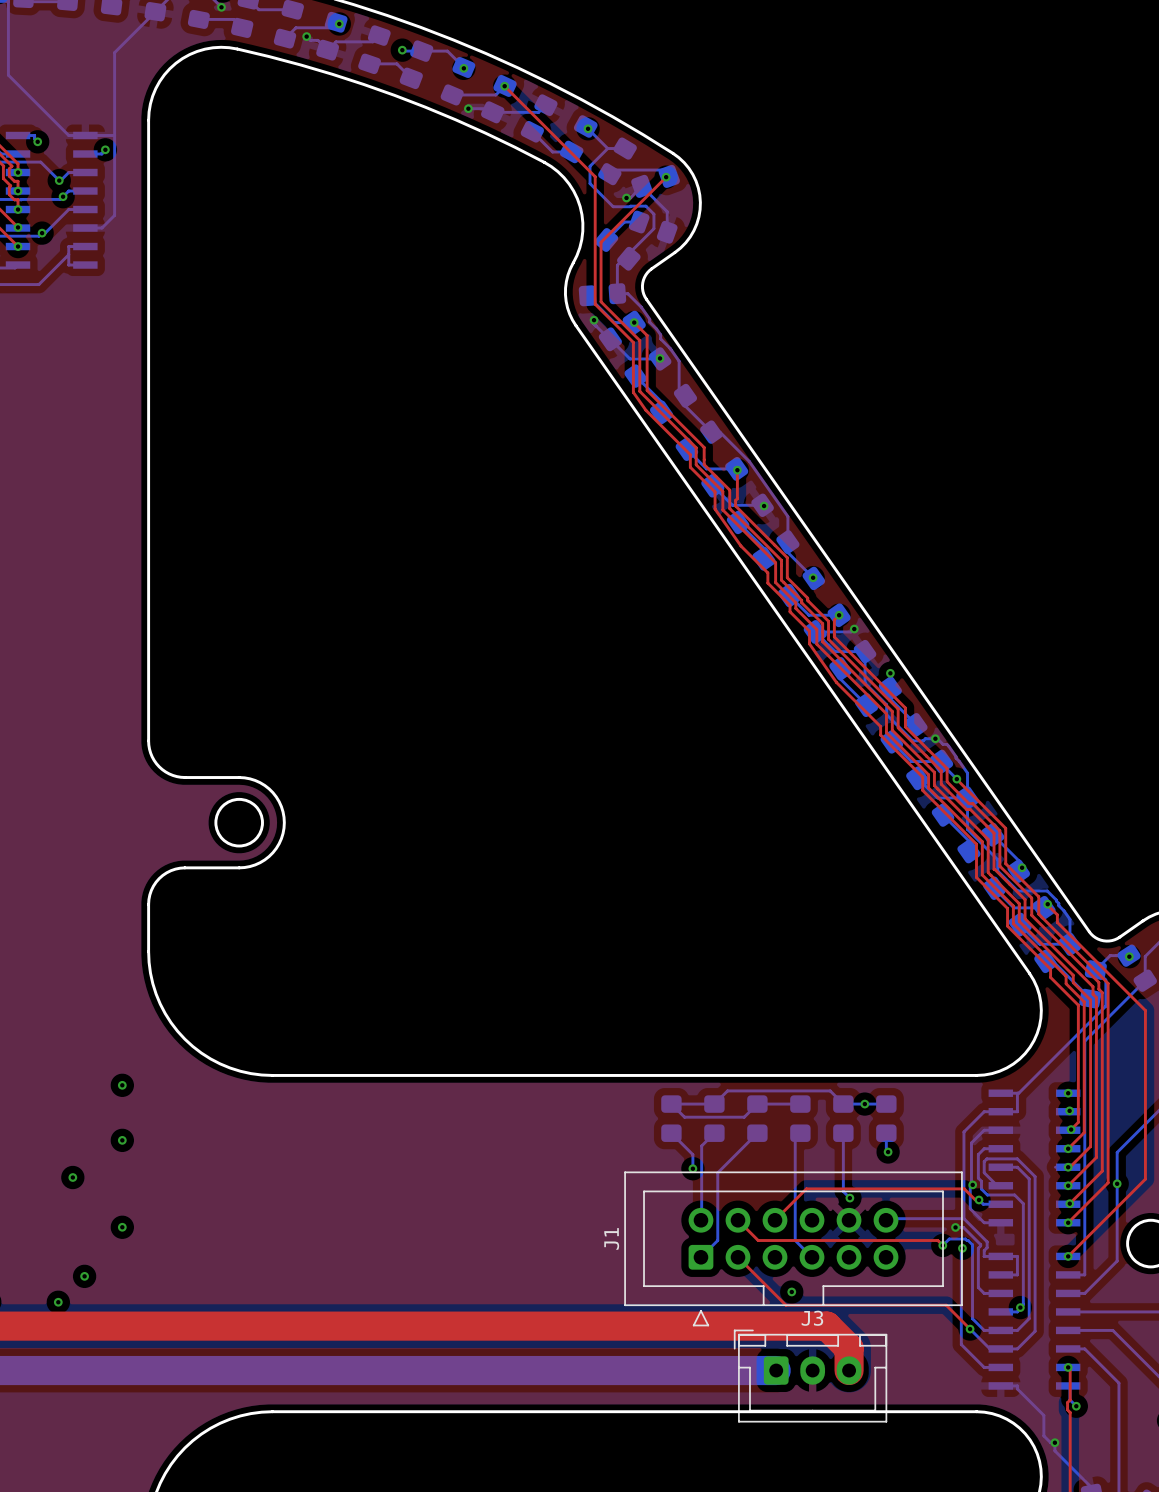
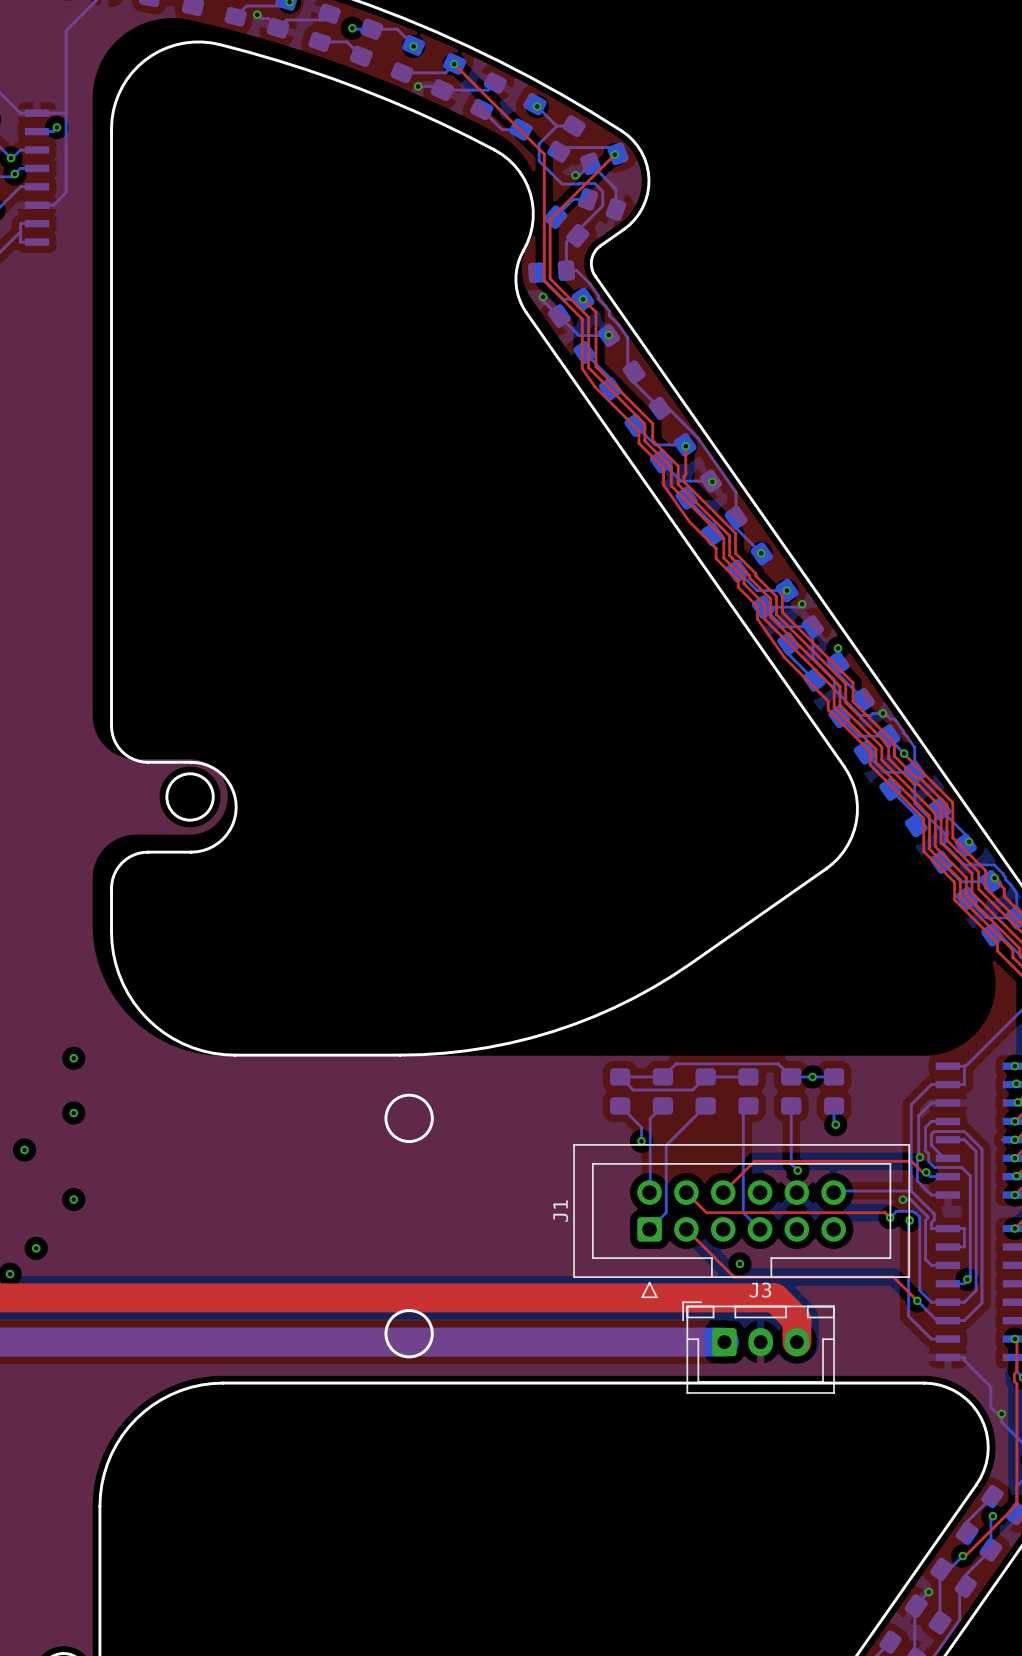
board edge: (237, 49) (332, 74) (425, 107) (485, 133) (544, 162) (557, 171) (569, 184) (577, 198) (582, 222) (579, 247) (567, 275) (565, 288) (566, 301) (572, 320) (1033, 980) (1040, 1002) (1039, 1025) (1030, 1047) (1013, 1063) (999, 1071) (976, 1075) (261, 1074) (240, 1071) (210, 1058) (184, 1039) (171, 1022) (156, 993) (149, 962) (148, 904) (153, 886) (162, 875) (175, 869) (239, 867) (255, 864) (264, 859) (276, 848) (284, 828) (281, 806) (272, 792) (264, 785) (244, 777) (185, 777) (172, 775) (156, 763) (148, 745) (149, 111) (155, 88) (164, 74) (175, 63) (189, 54) (204, 49) (221, 47) (237, 49) -> (219, 44) (304, 69) (387, 99) (494, 150) (514, 165) (527, 186) (533, 210) (530, 235) (518, 262) (516, 275) (517, 294) (522, 307) (844, 766) (852, 781) (857, 805) (856, 821) (848, 844) (832, 863) (672, 975) (614, 1007) (573, 1024) (509, 1043) (444, 1053) (400, 1055) (224, 1054) (192, 1047) (173, 1038) (155, 1026) (133, 1002) (118, 974) (111, 942) (111, 888) (112, 879) (119, 866) (125, 859) (138, 853) (197, 851) (213, 846) (223, 838) (230, 829) (234, 818) (236, 807) (234, 795) (230, 784) (223, 775) (213, 768) (197, 762) (147, 762) (133, 759) (119, 748) (111, 730) (111, 120) (115, 102) (126, 79) (138, 66) (152, 55) (167, 47) (184, 43) (202, 42) (219, 44)
round board edge: none -> [384, 1093, 434, 1144]
round board edge: none -> [384, 1309, 434, 1359]

